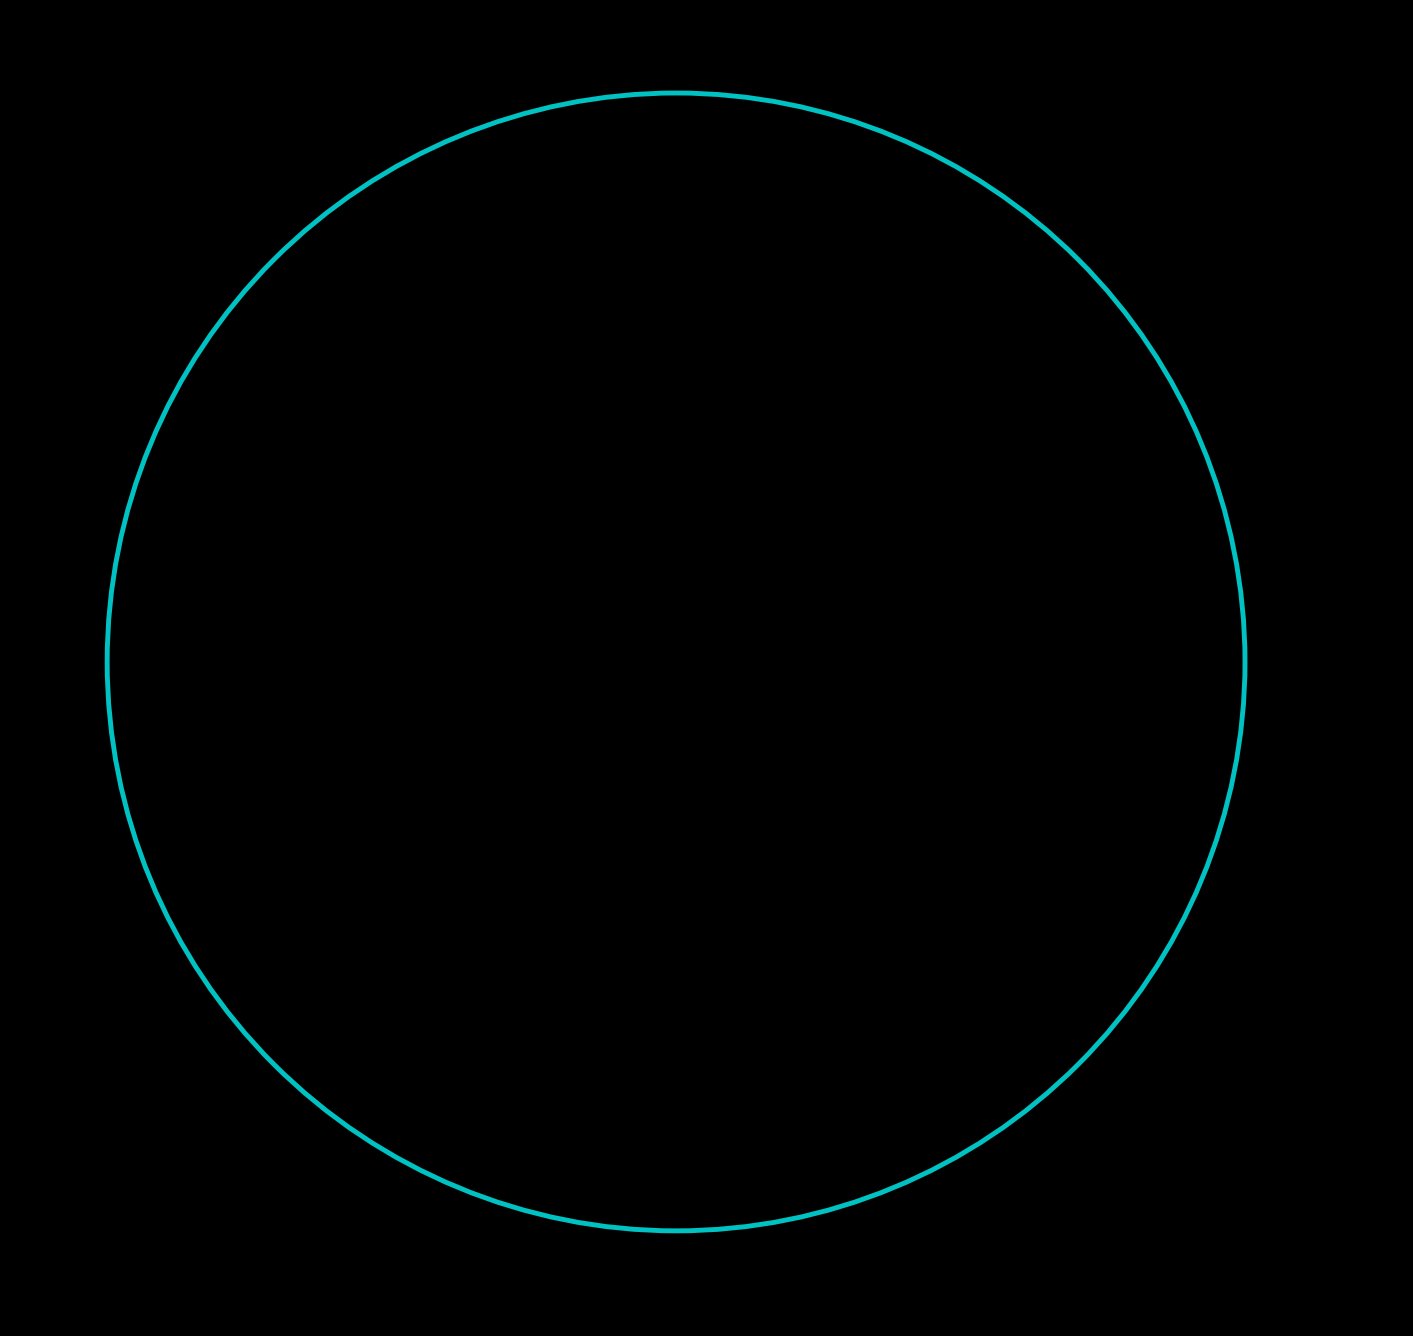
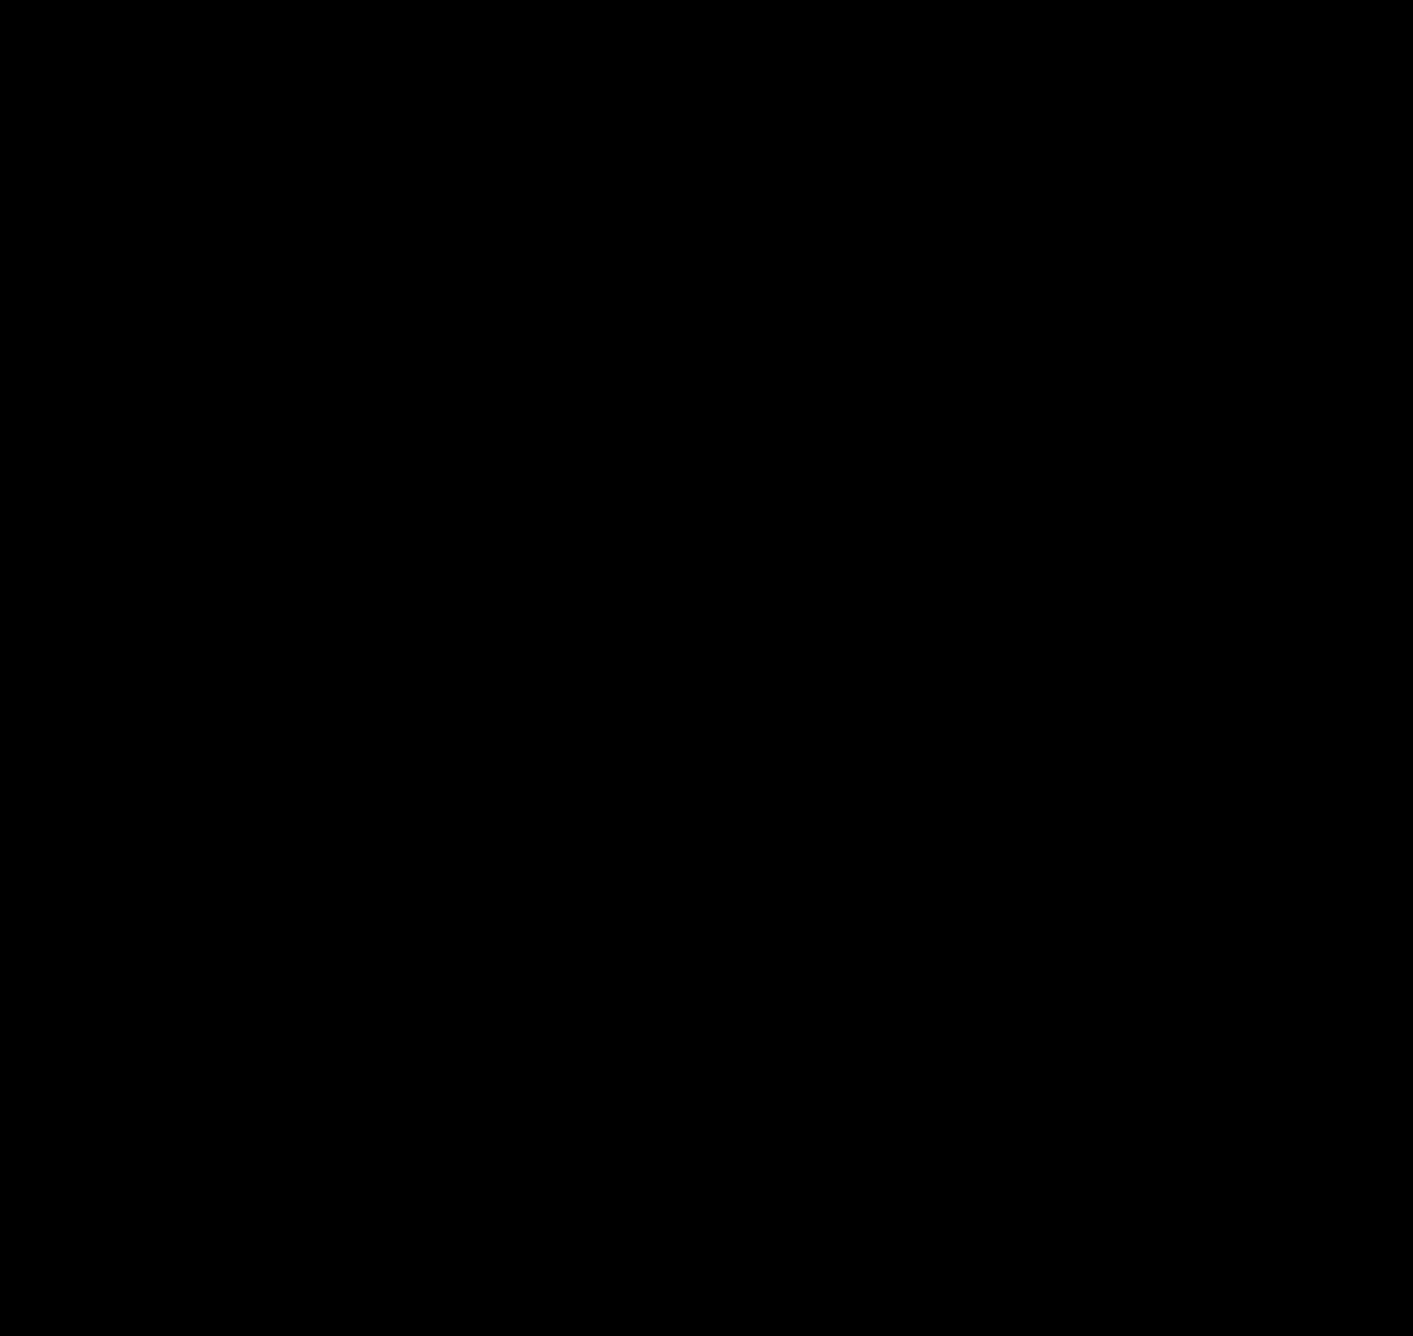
drawing: [104, 90, 1248, 1234] -> none

